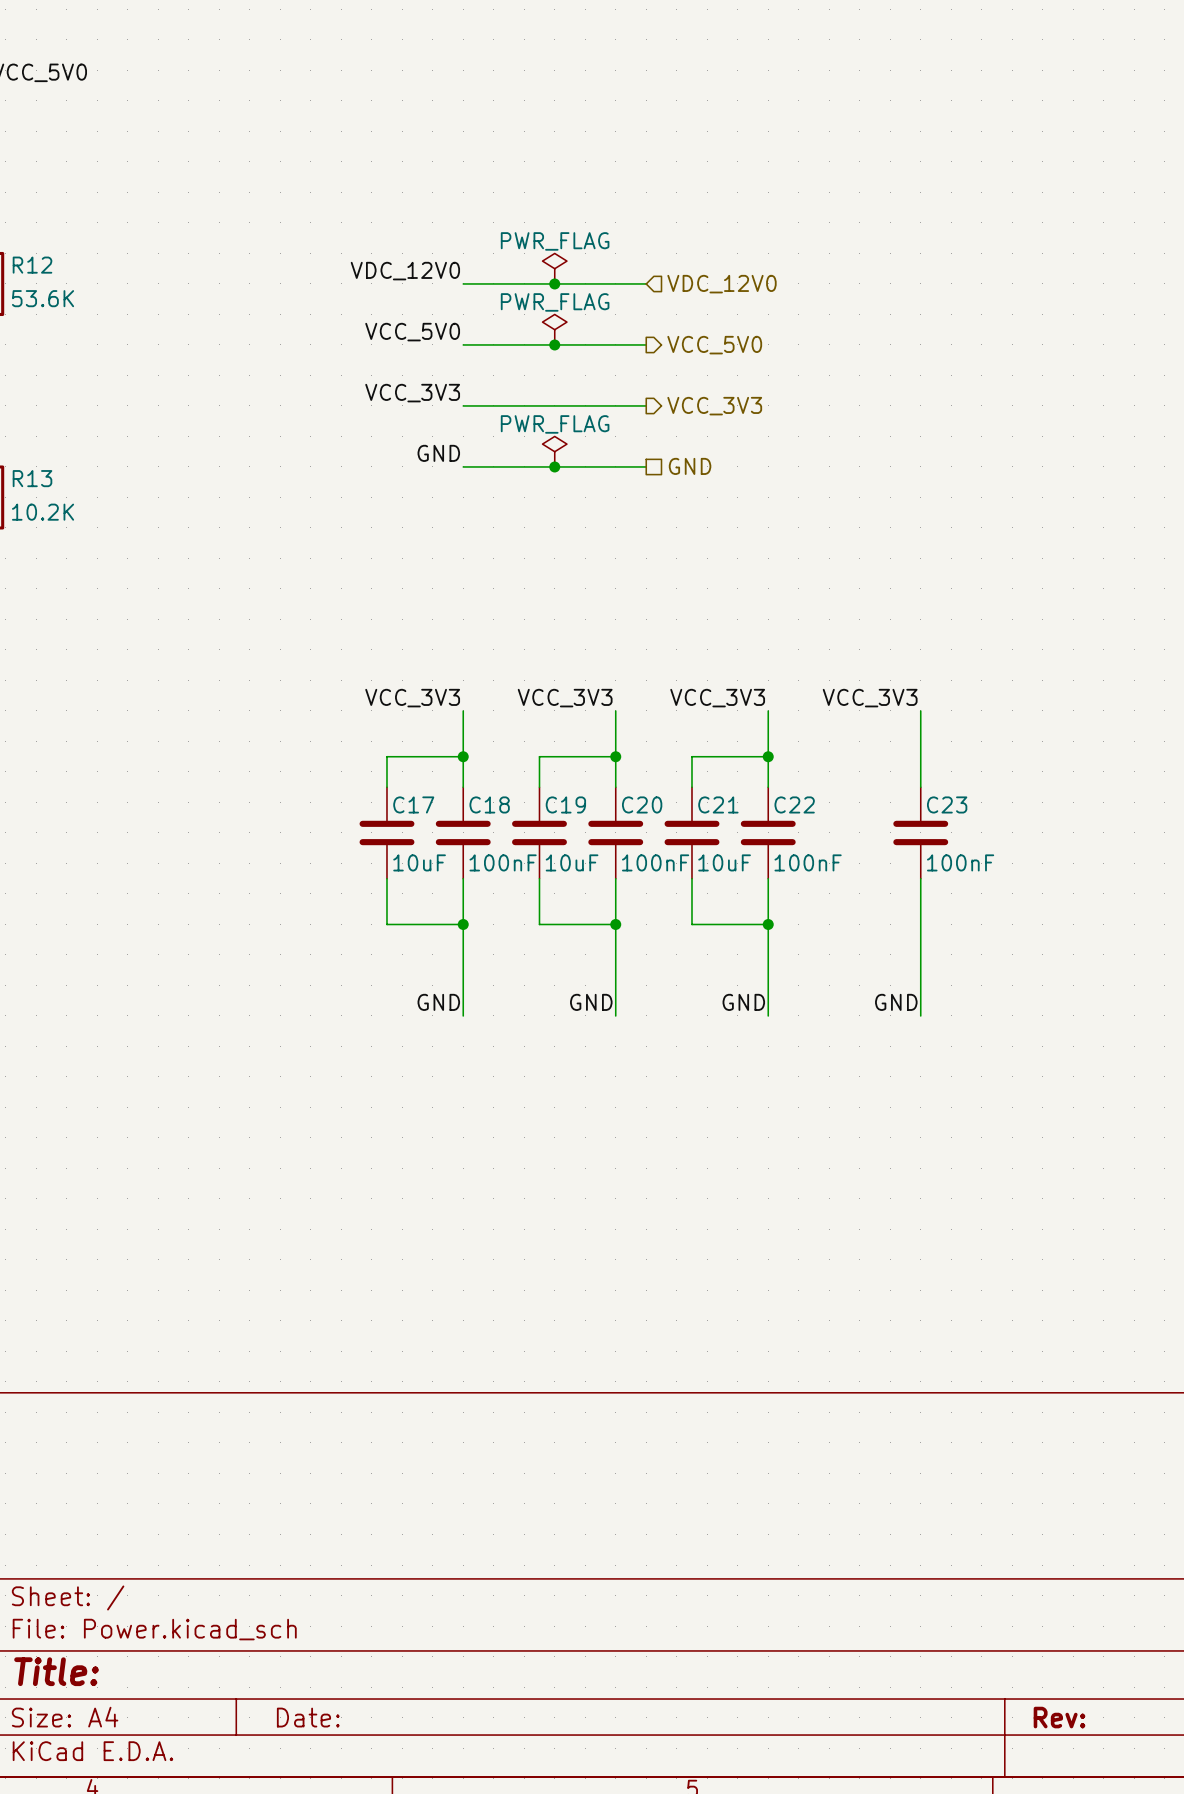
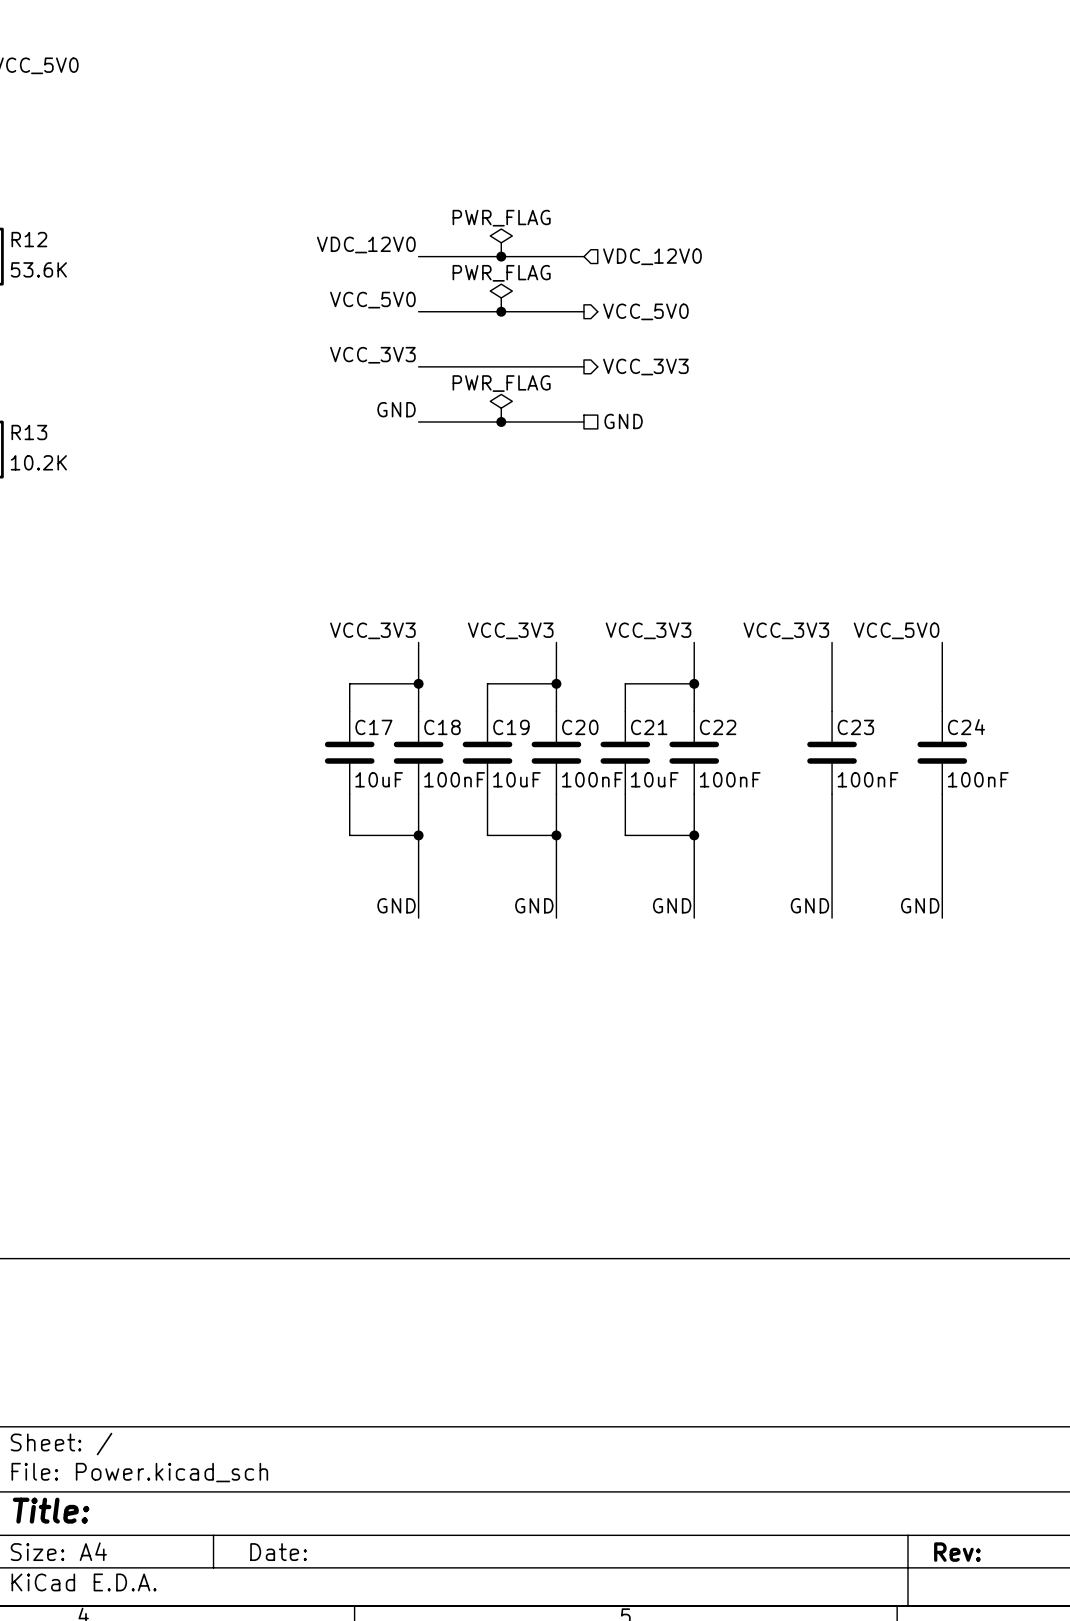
label: none -> VCC_5V0 (896, 630)
wire: none -> (942, 642) (942, 711)
C24: none -> 100nF (942, 752)
wire: none -> (942, 794) (942, 918)
label: none -> GND (920, 905)

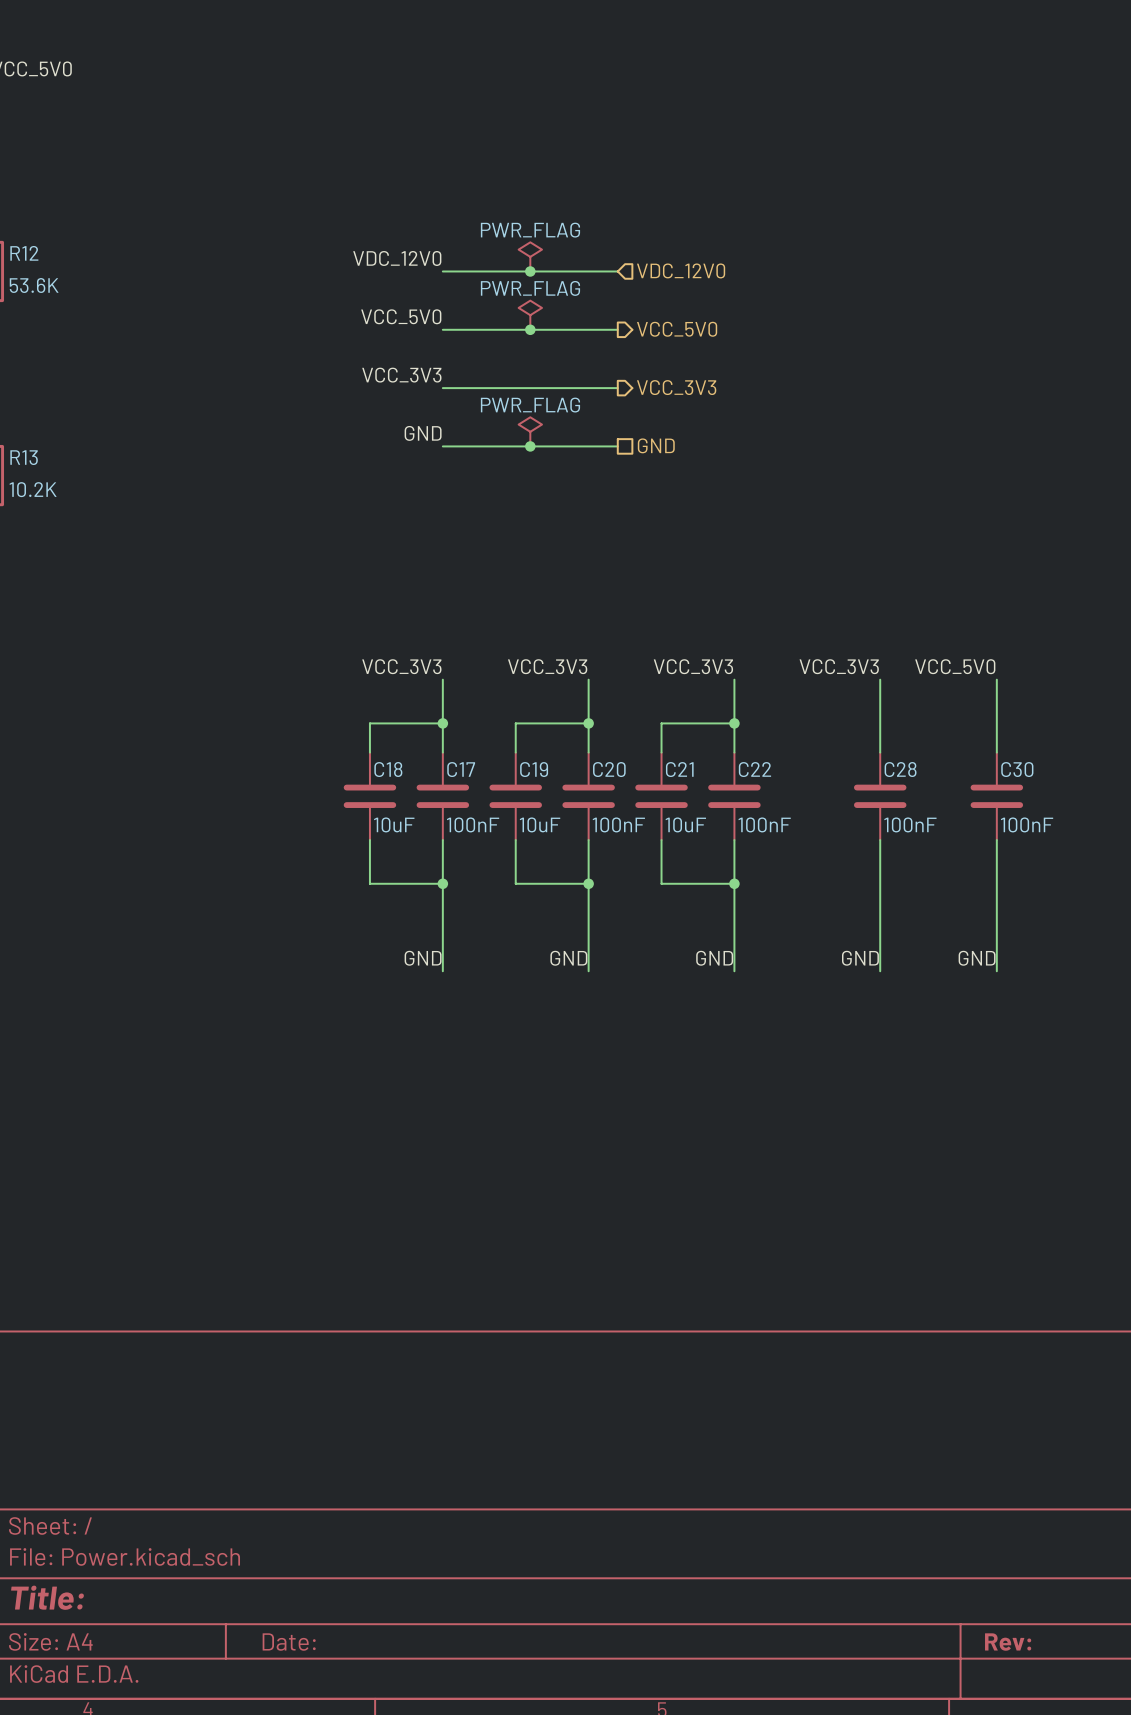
C17 name: C17 (373, 727) -> C18 (388, 769)
C18 name: C18 (442, 727) -> C17 (461, 769)
C23 name: C23 (855, 727) -> C28 (900, 769)
C24 name: C24 (966, 727) -> C30 (1017, 769)

